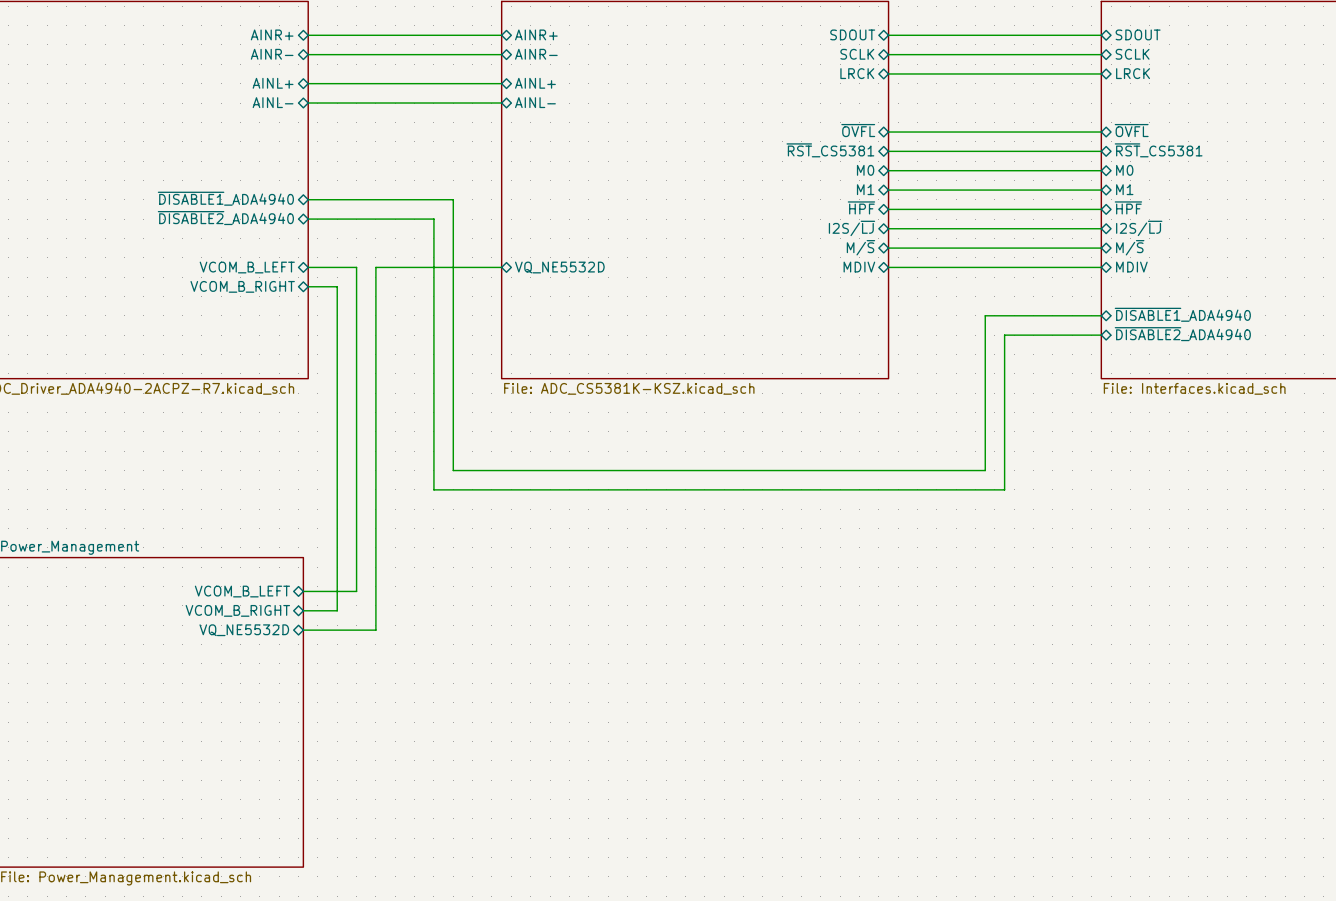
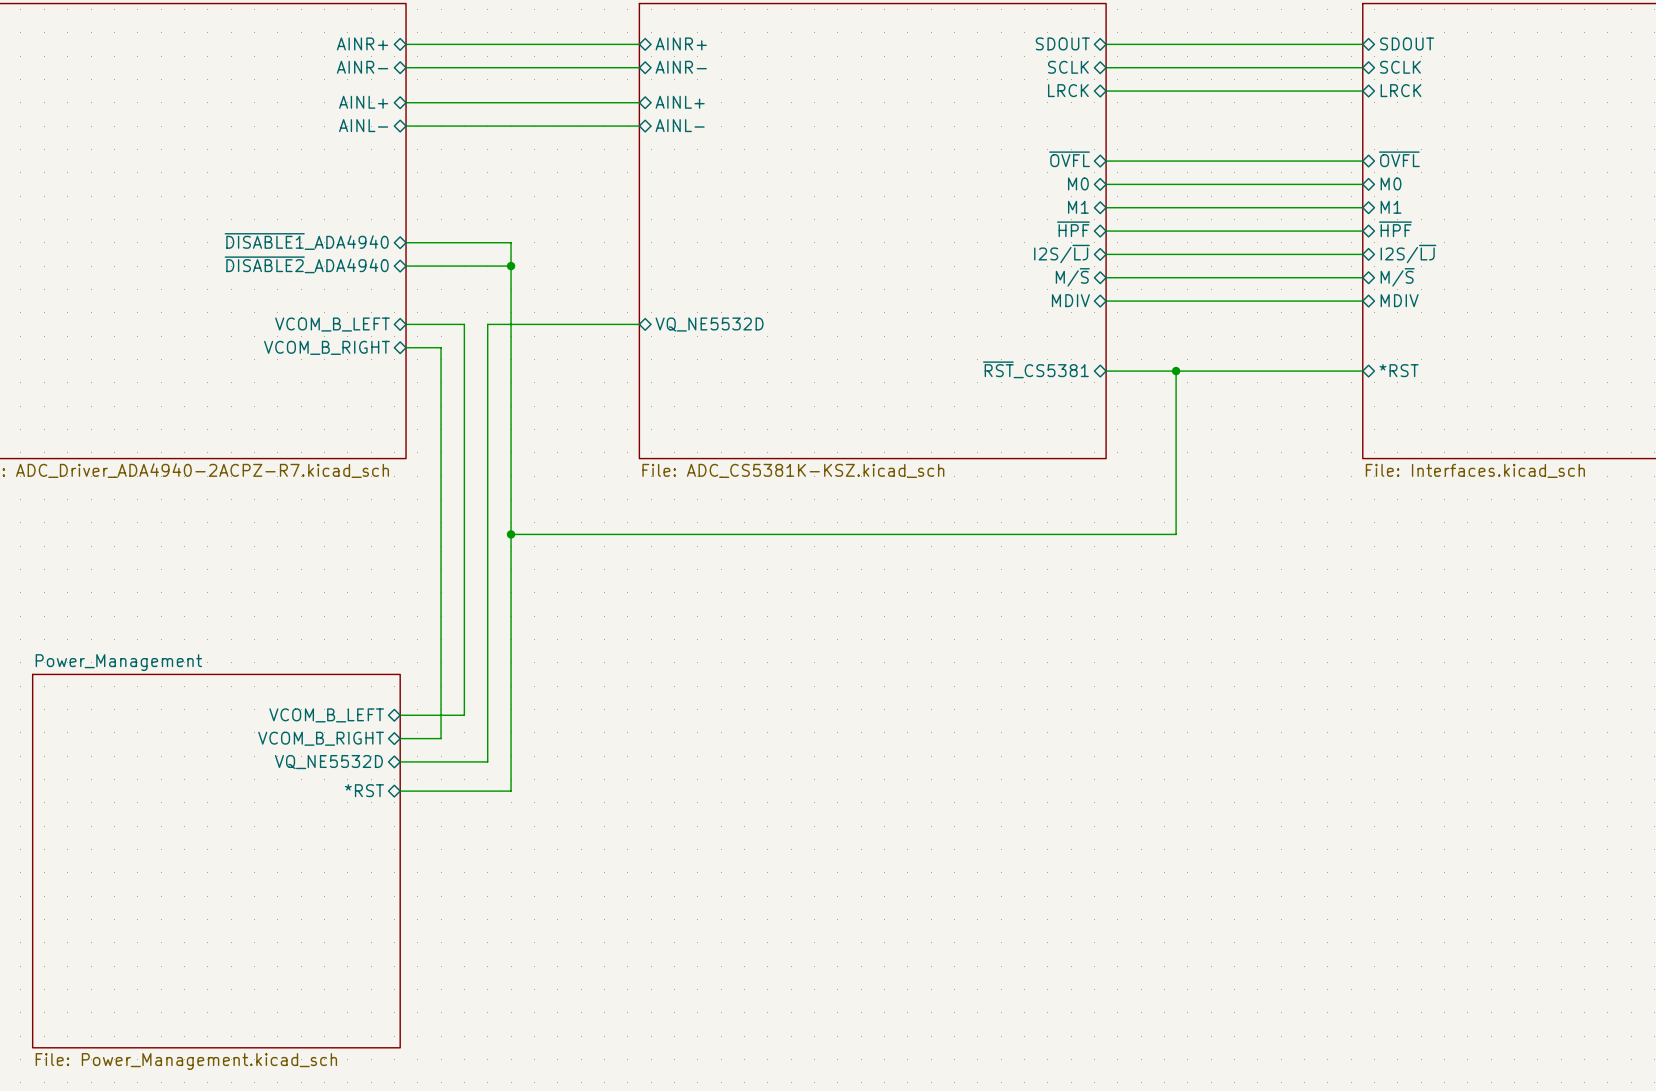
sheet pin: ~{RST}_CS5381 (830, 150) -> M0 (1078, 183)
sheet pin: ~{RST}_CS5381 (1158, 150) -> M0 (1391, 183)
sheet pin: M0 (865, 170) -> M1 (1078, 207)
sheet pin: M0 (1124, 170) -> M1 (1391, 207)
sheet pin: M1 (865, 189) -> ~{HPF} (1073, 229)
sheet pin: M1 (1124, 189) -> ~{HPF} (1395, 229)
wire: (395, 199) (453, 199) (453, 470) (985, 470) (985, 315) (1101, 315) -> (511, 242) (511, 791) (400, 791)
sheet pin: ~{HPF} (861, 207) -> I2S/~{LJ} (1061, 254)
sheet pin: ~{HPF} (1128, 207) -> I2S/~{LJ} (1408, 254)
wire: (395, 219) (433, 219) (433, 489) (1004, 489) (1004, 335) (1101, 335) -> none
junction: none -> (511, 266)
sheet pin: I2S/~{LJ} (851, 228) -> M/~{S} (1072, 277)
sheet pin: I2S/~{LJ} (1139, 228) -> M/~{S} (1397, 277)
sheet pin: M/~{S} (860, 247) -> MDIV (1070, 300)
sheet pin: M/~{S} (1130, 247) -> MDIV (1399, 300)
sheet pin: MDIV (859, 267) -> none
wire: (888, 267) (1101, 267) -> (1106, 371) (1362, 371)
sheet pin: MDIV (1131, 267) -> none
sheet pin: none -> ~{RST}_CS5381 (1035, 369)
sheet pin: none -> *RST (1399, 370)
wire: none -> (1176, 371) (1176, 534) (511, 534)
junction: none -> (1176, 371)
sheet pin: ~{DISABLE1}_ADA4940 (1182, 314) -> none
sheet pin: ~{DISABLE2}_ADA4940 (1182, 334) -> none
junction: none -> (511, 534)
sheet pin: none -> *RST (364, 790)

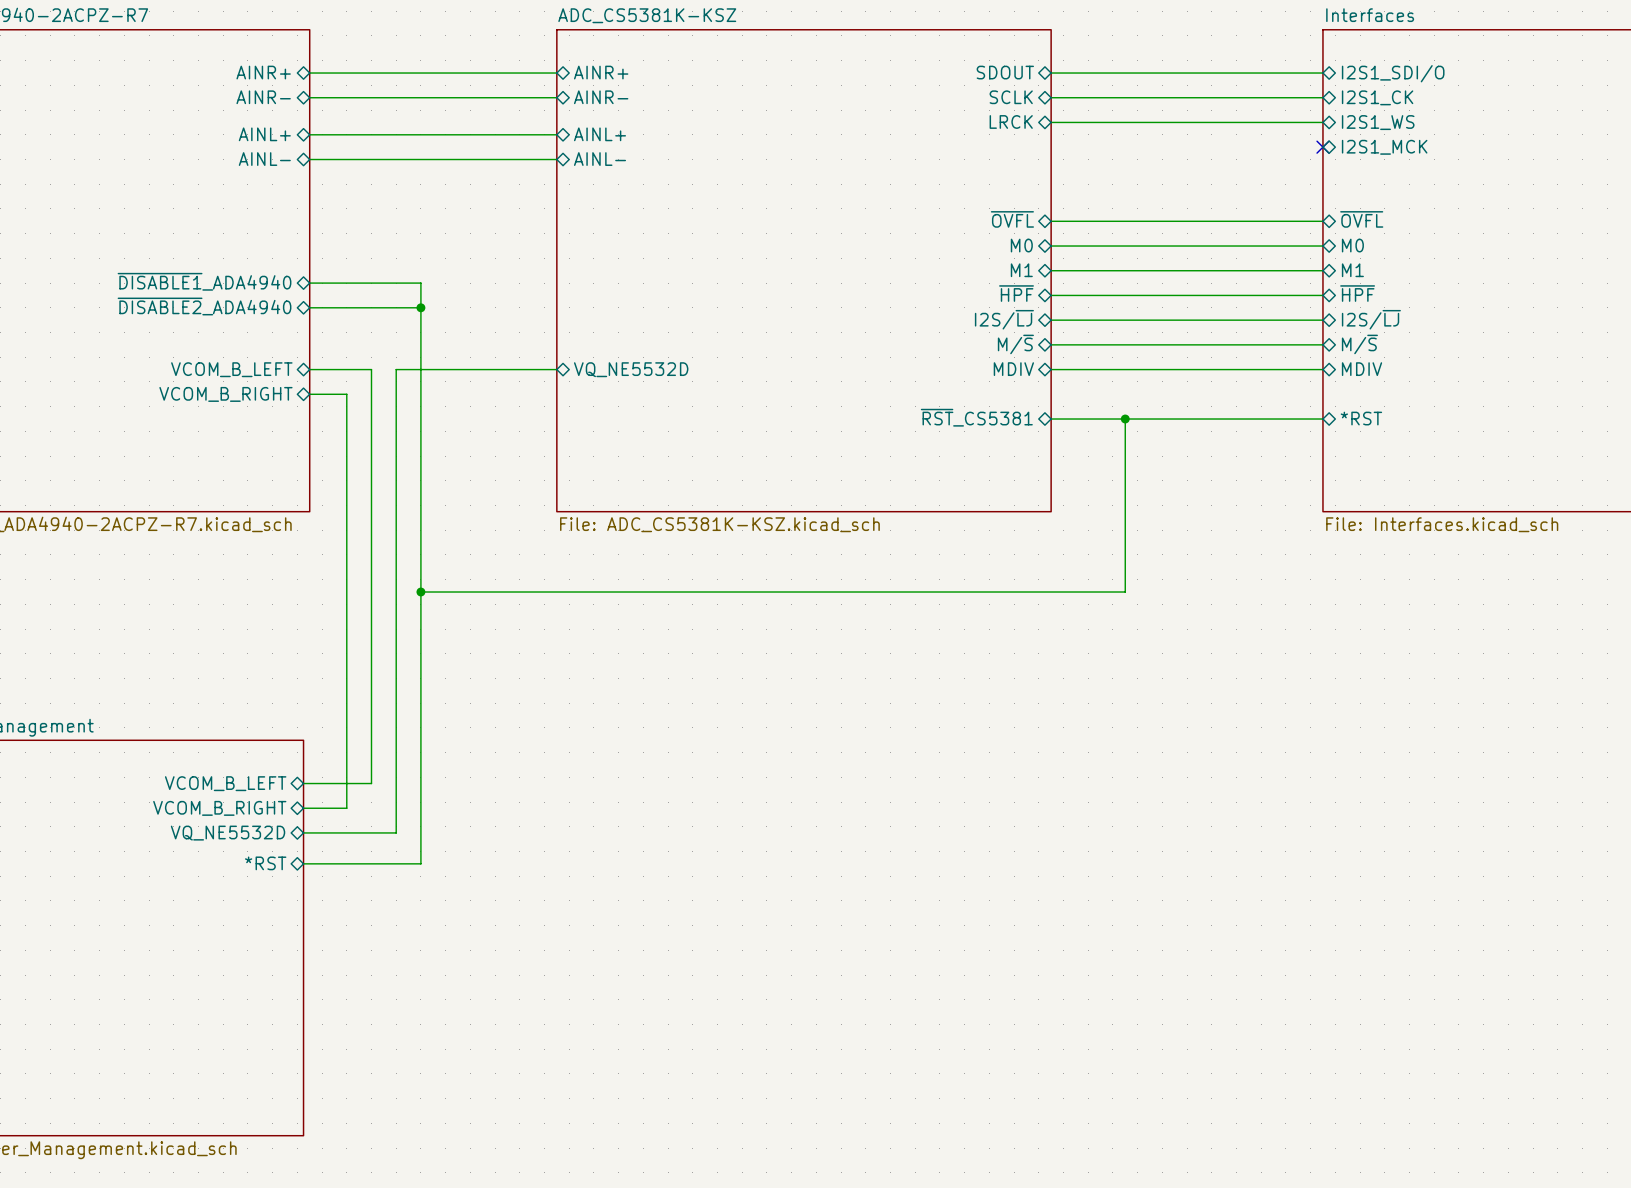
sheet pin: SDOUT (1407, 43) -> I2S1_SDI/O (1393, 73)
sheet pin: SCLK (1400, 67) -> I2S1_CK (1377, 97)
sheet pin: LRCK (1401, 90) -> I2S1_WS (1378, 122)
no-connect mark: none -> (1322, 147)
sheet pin: none -> I2S1_MCK (1384, 147)
sheet pin: ~{OVFL} (1069, 159) -> none
sheet pin: ~{OVFL} (1399, 159) -> none
wire: (1106, 161) (1362, 161) -> (1051, 369) (1322, 369)
sheet pin: M0 (1078, 183) -> ~{OVFL} (1012, 219)
sheet pin: M0 (1391, 183) -> ~{OVFL} (1361, 219)
sheet pin: M1 (1078, 207) -> M0 (1021, 245)
sheet pin: M1 (1391, 207) -> M0 (1352, 245)
sheet pin: ~{HPF} (1073, 229) -> M1 (1021, 270)
sheet pin: ~{HPF} (1395, 229) -> M1 (1352, 270)
sheet pin: I2S/~{LJ} (1061, 254) -> ~{HPF} (1016, 293)
sheet pin: I2S/~{LJ} (1408, 254) -> ~{HPF} (1357, 293)
sheet pin: M/~{S} (1072, 277) -> I2S/~{LJ} (1004, 319)
sheet pin: M/~{S} (1397, 277) -> I2S/~{LJ} (1371, 319)
sheet pin: MDIV (1070, 300) -> M/~{S} (1015, 344)
sheet pin: MDIV (1399, 300) -> M/~{S} (1359, 344)
sheet pin: none -> MDIV (1013, 369)
sheet pin: none -> MDIV (1362, 369)

